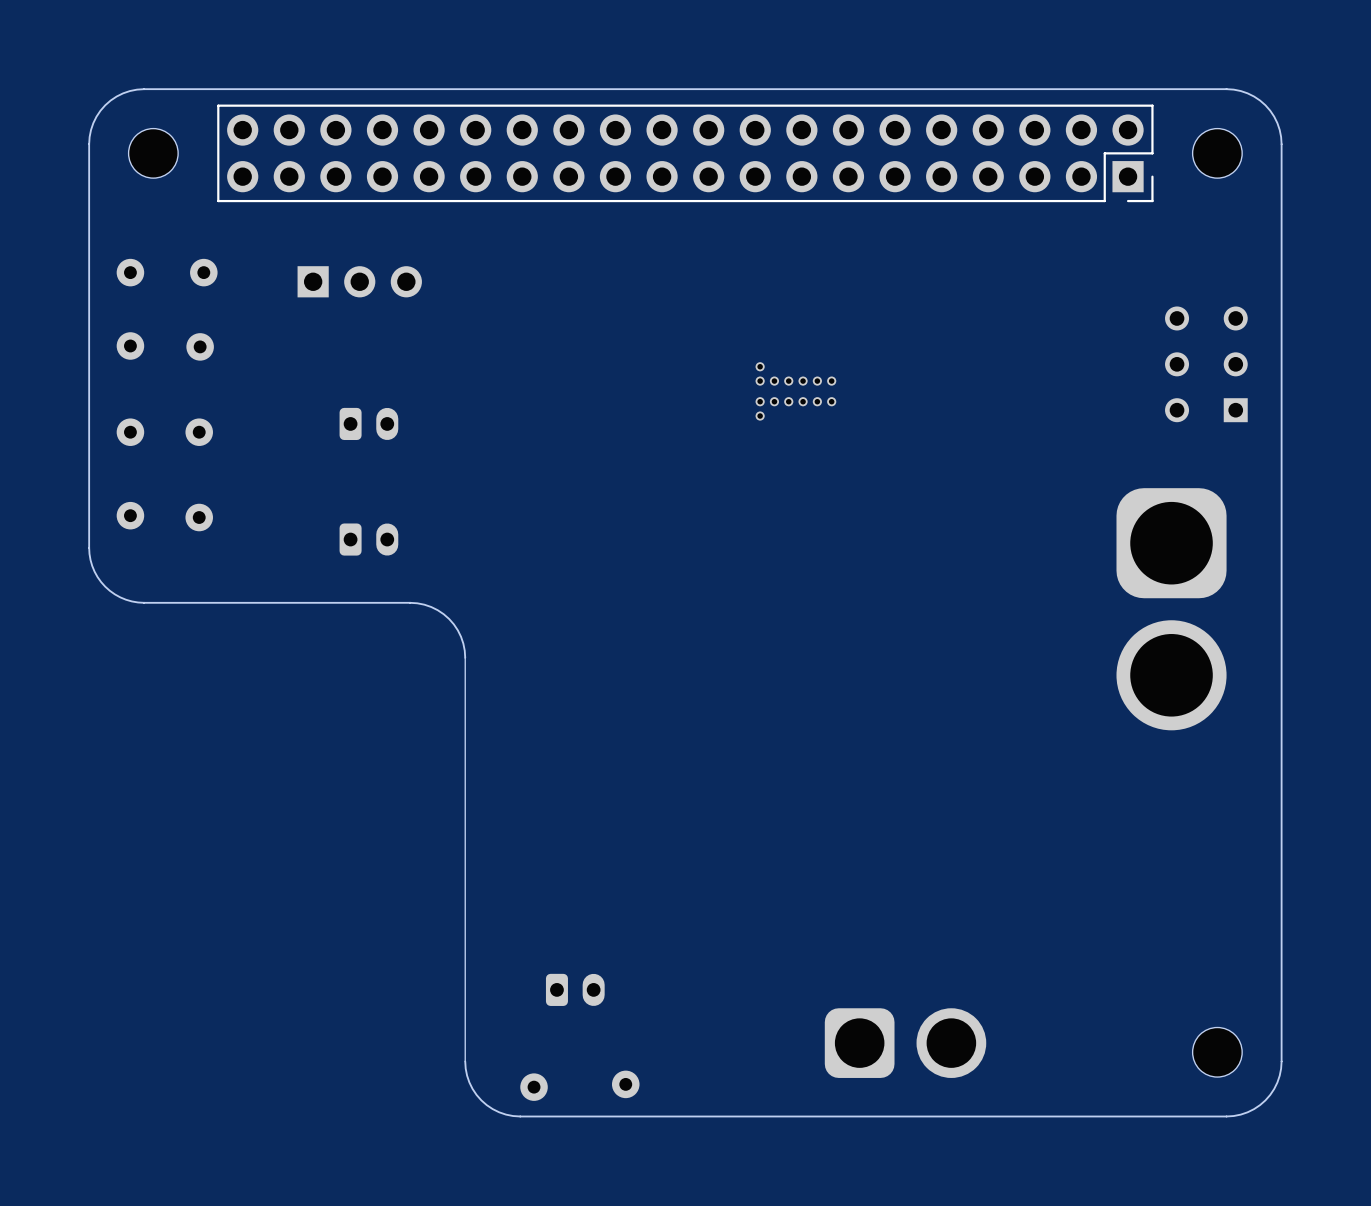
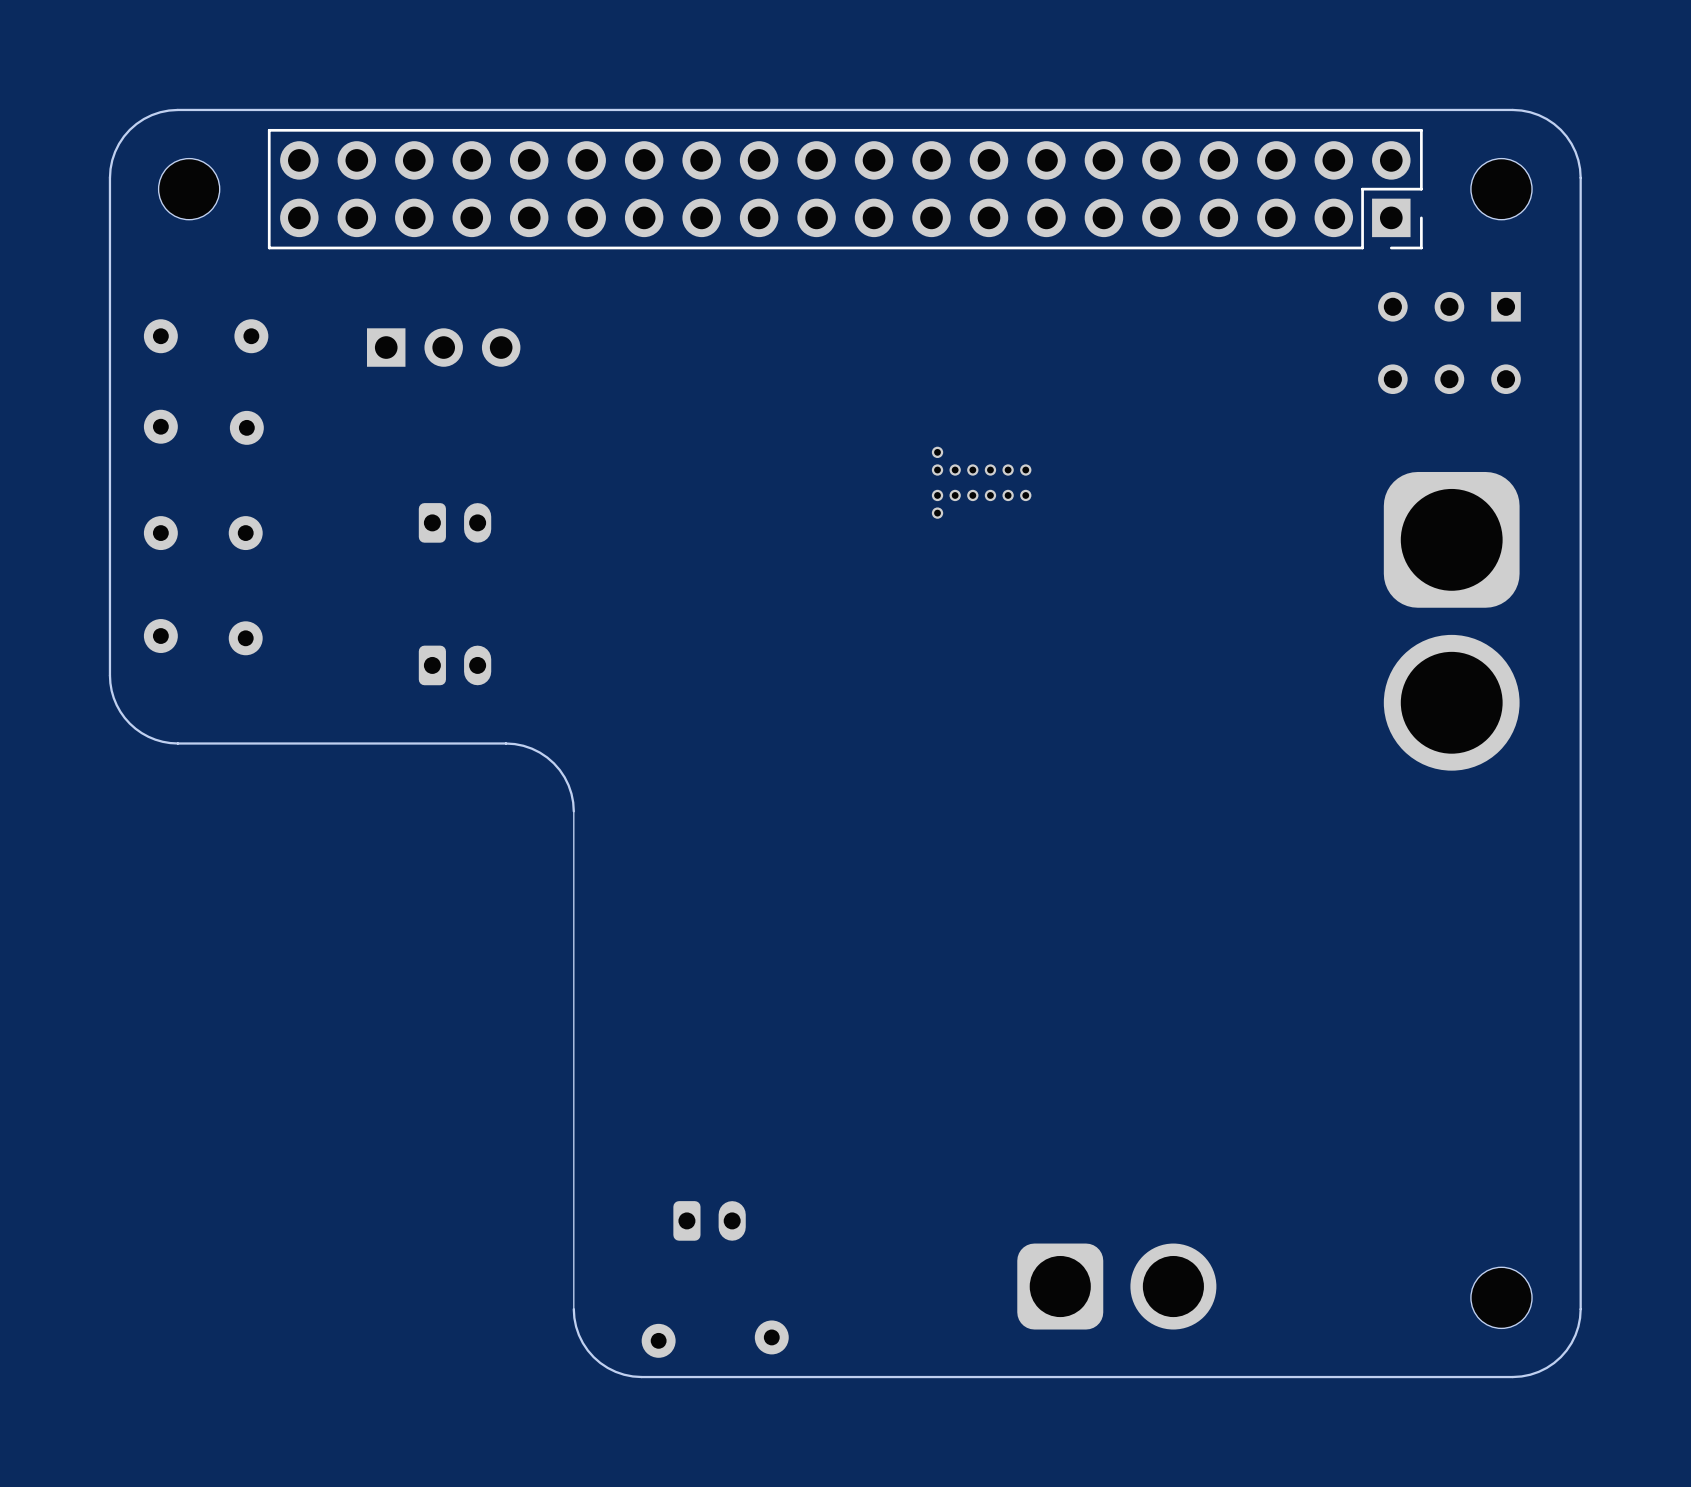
part rotation: 0° (1206, 364) -> 90° counterclockwise (1449, 343)
part position: (1206, 364) -> (1449, 343)
part position: (1171, 609) -> (1451, 621)

